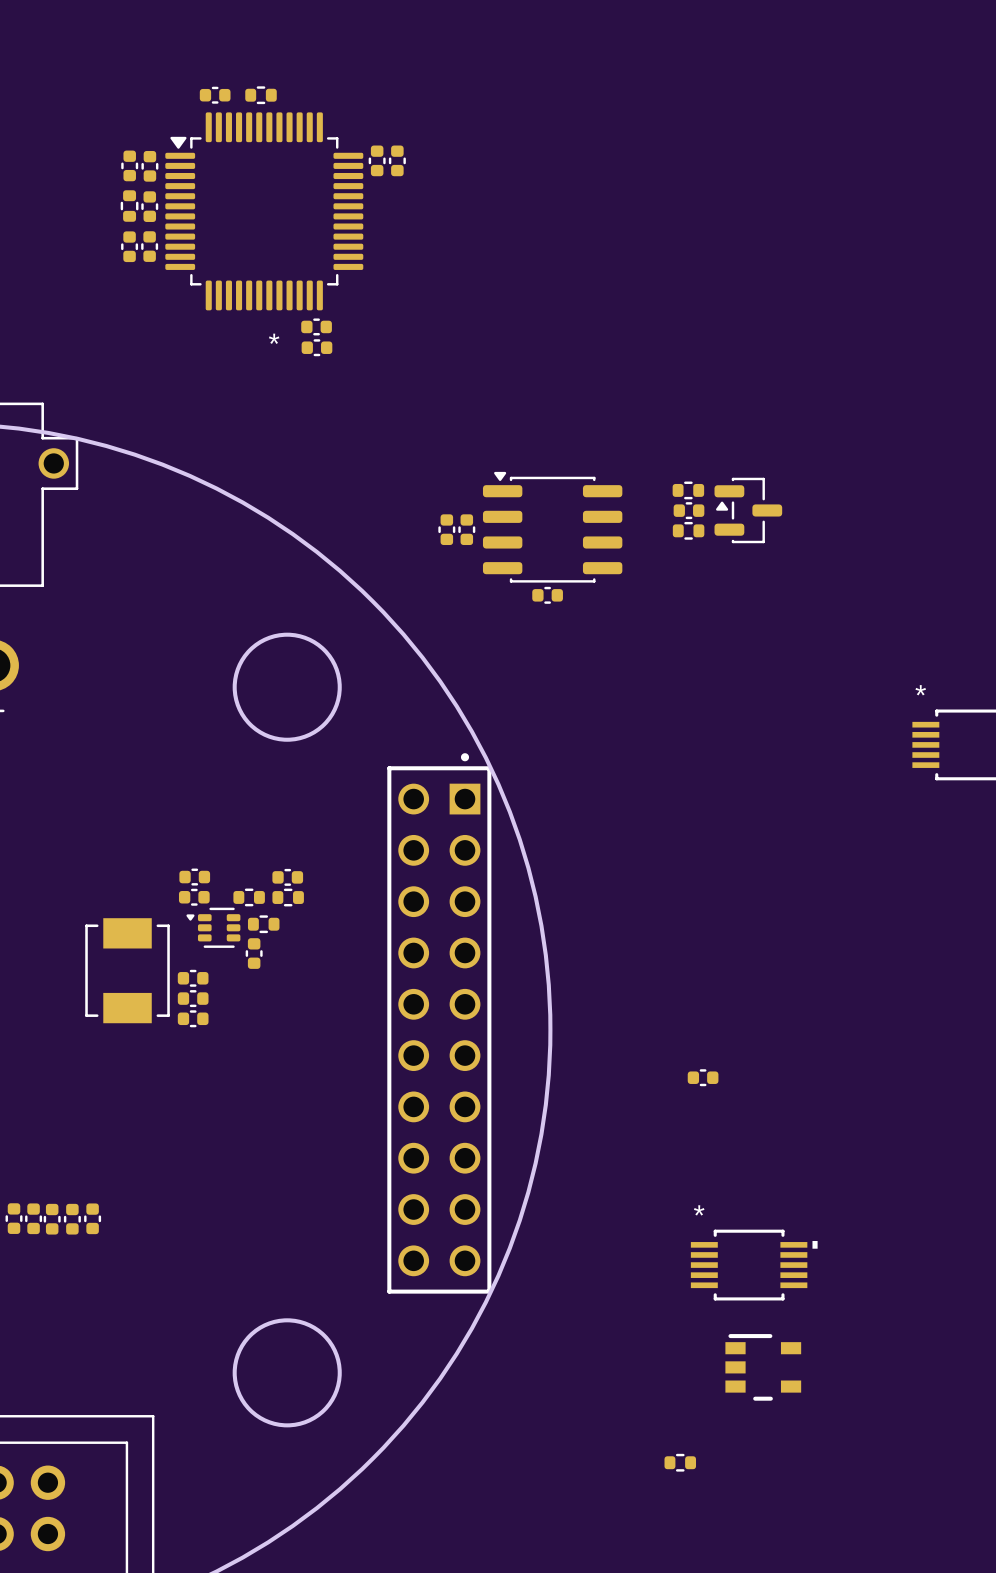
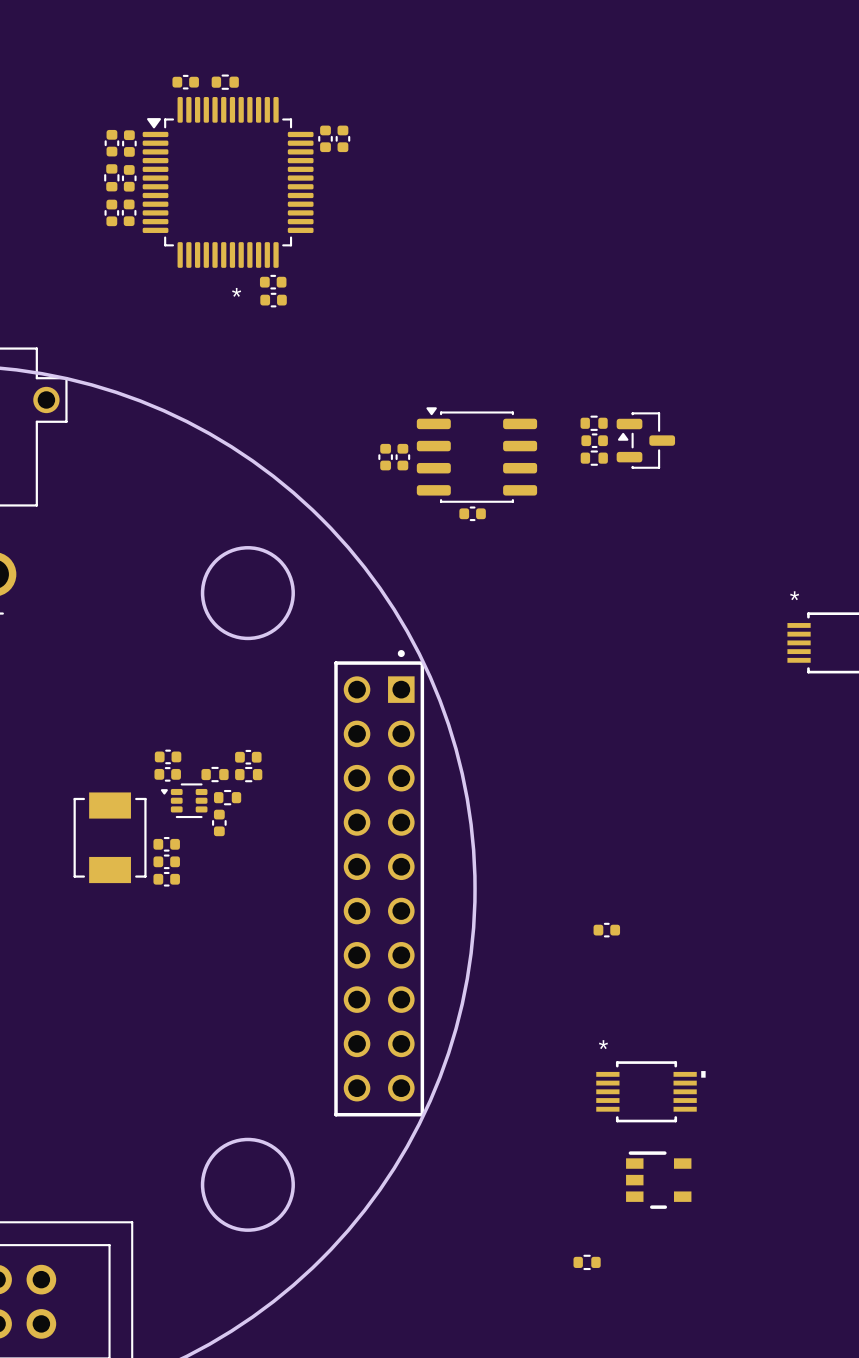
part: (14, 1218) -> none
part: (33, 1218) -> none
part: (92, 1218) -> none
part: (52, 1219) -> none
part: (72, 1219) -> none

